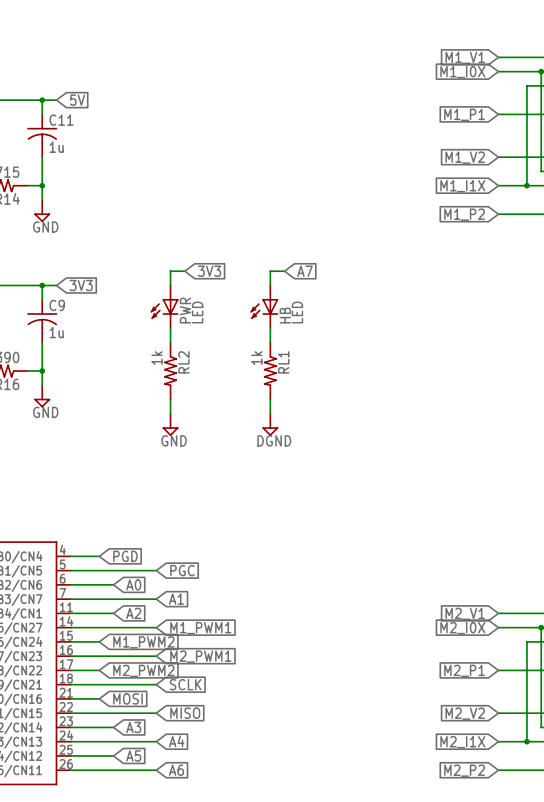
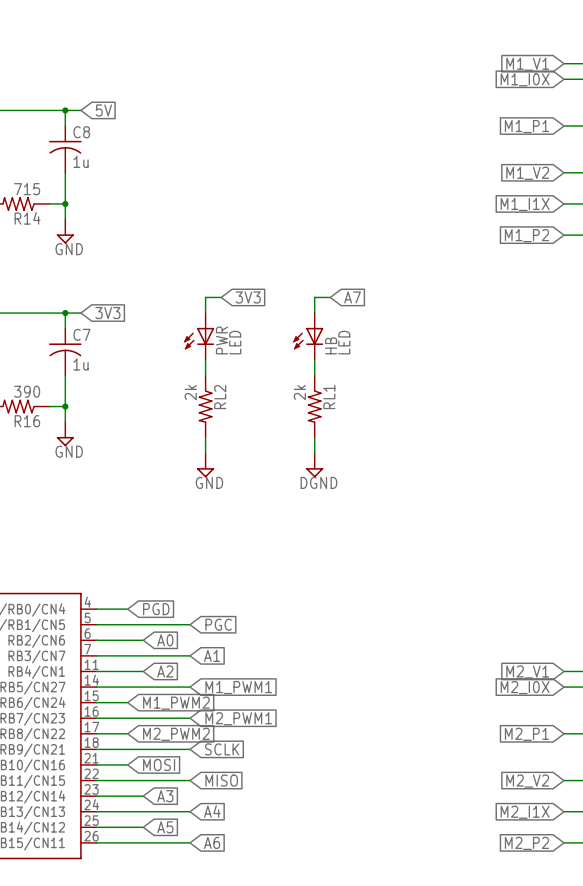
C11 name: C11 (61, 120) -> C8 (81, 132)
C9 name: C9 (57, 305) -> C7 (81, 334)
RL2 value: 1k (157, 358) -> 2k (190, 392)
RL1 value: 1k (256, 358) -> 2k (299, 392)

